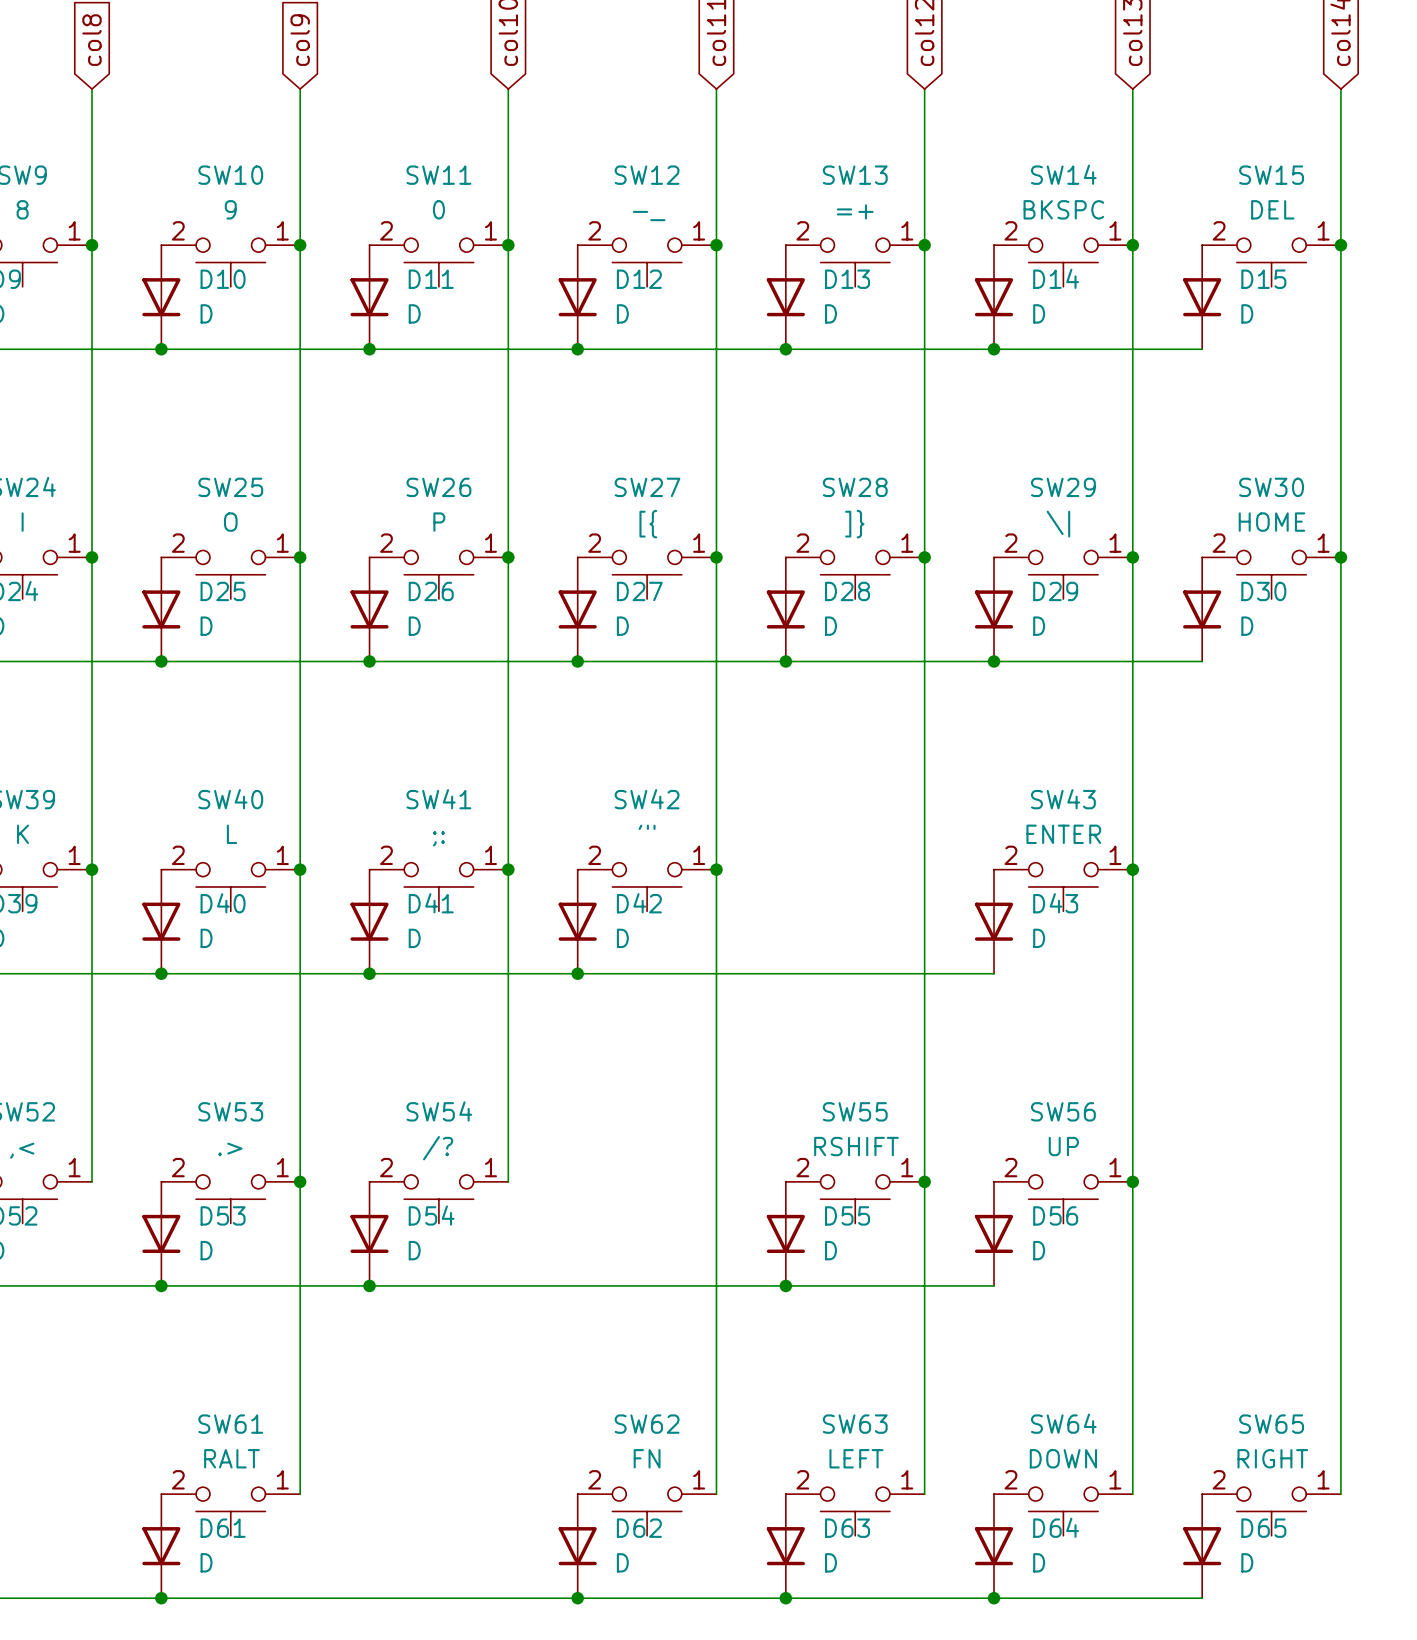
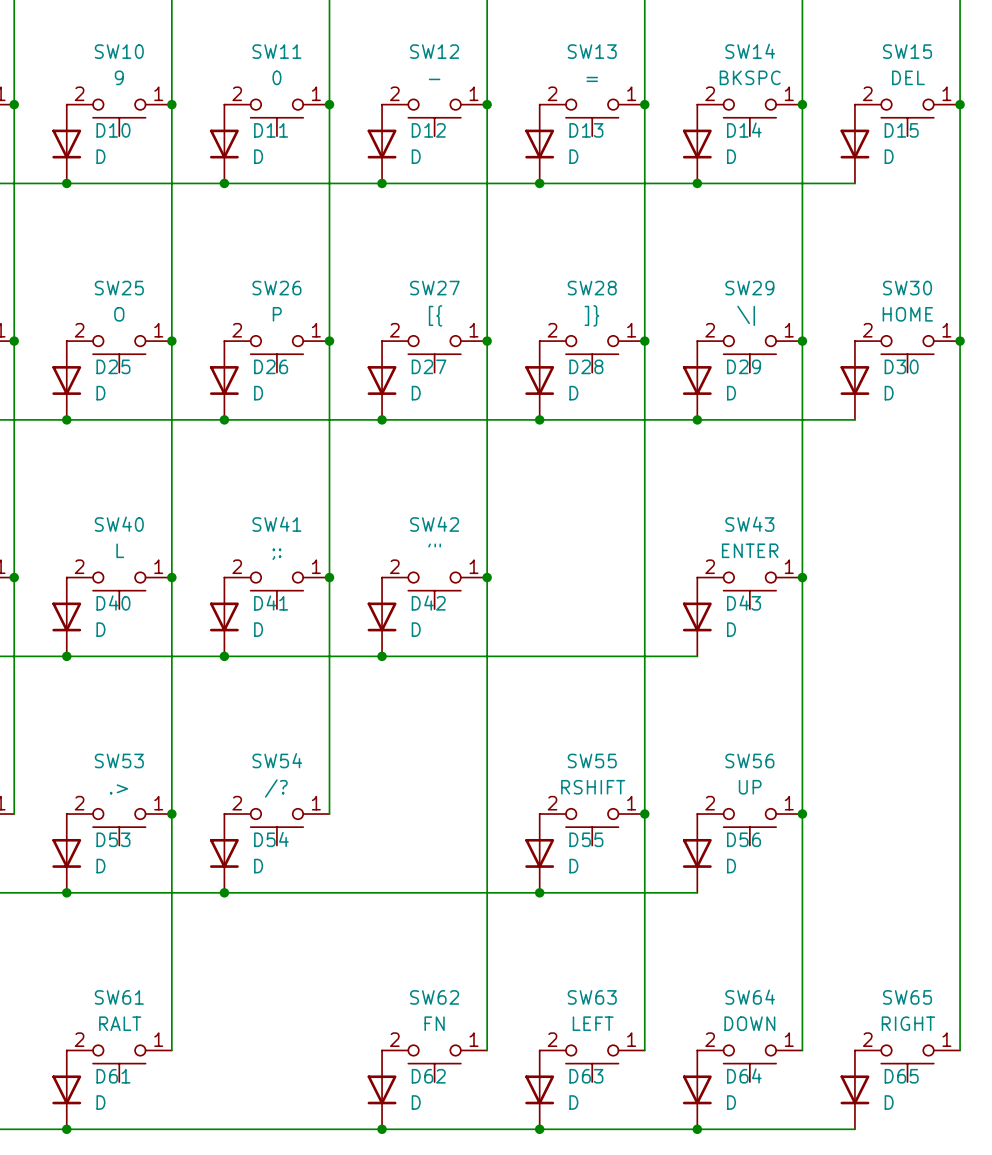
SW13 value: =+ (855, 211) -> = (592, 79)
SW12 value: -_ (649, 216) -> - (434, 79)

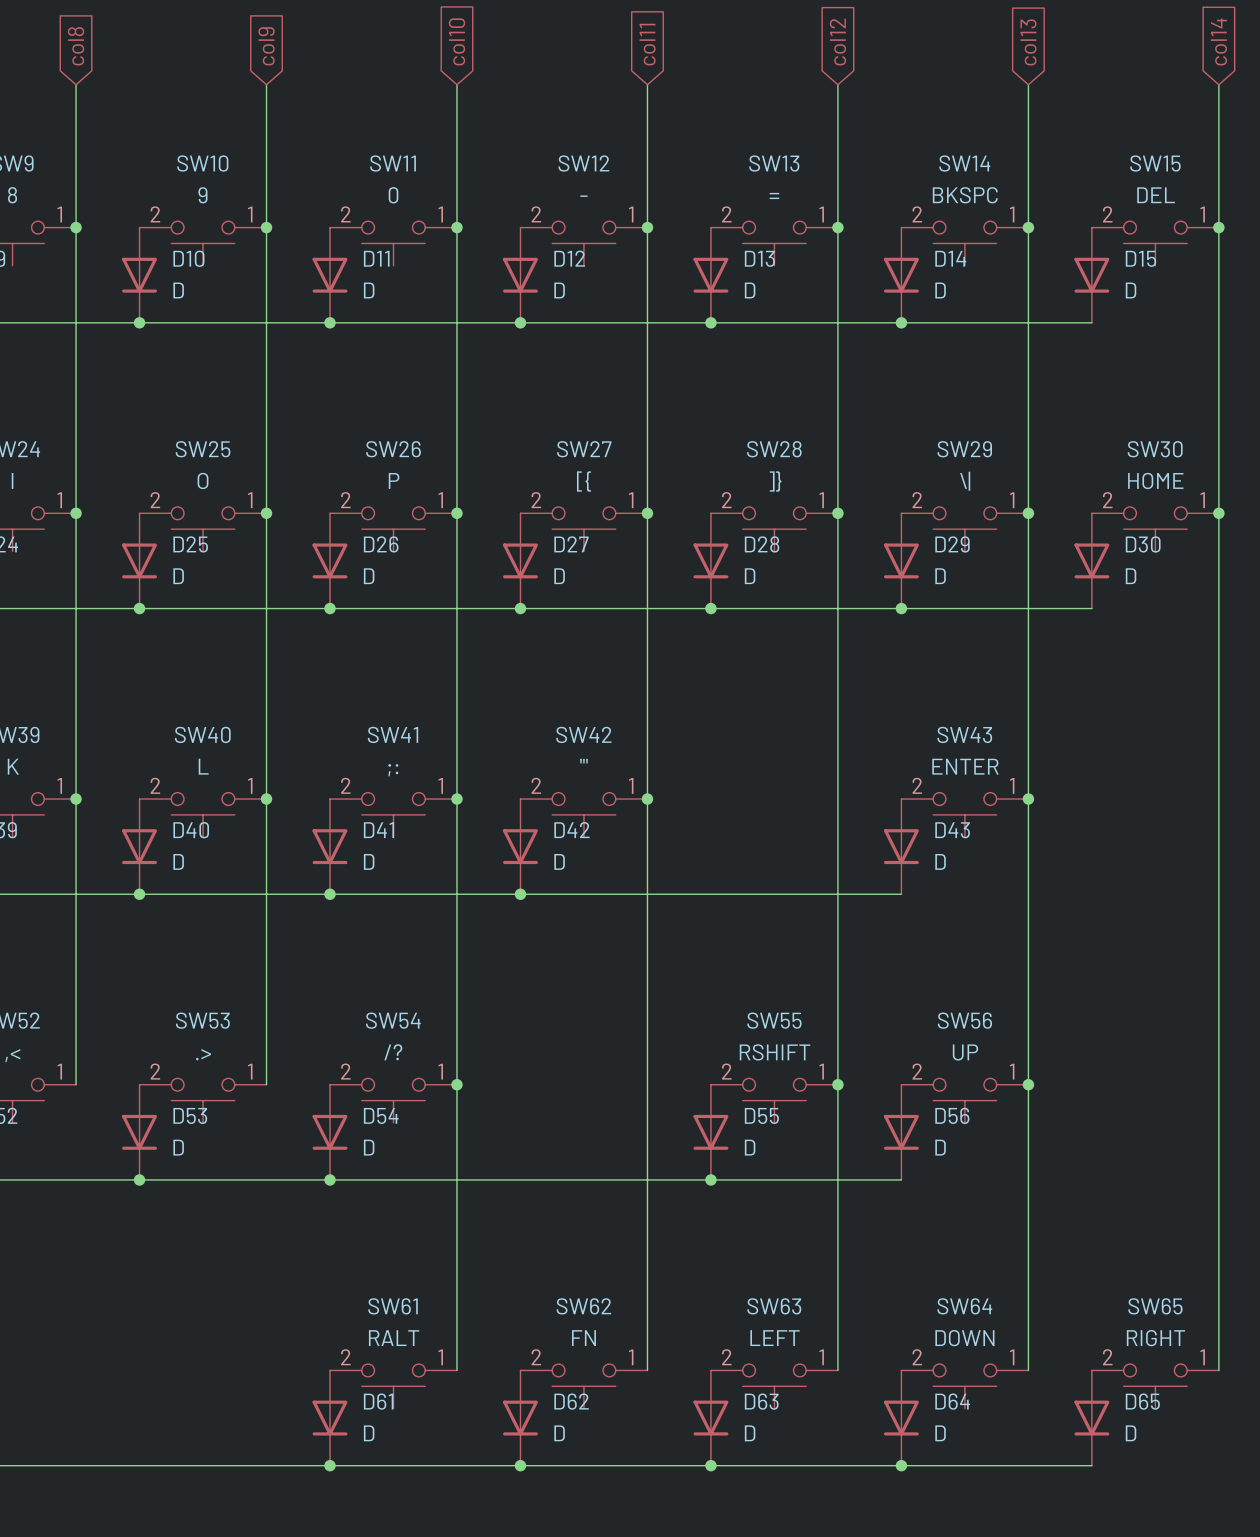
wire: (171, 814) (171, 1050) -> (456, 1084) (456, 1370)
junction: (171, 814) -> none
junction: none -> (456, 1084)
SW61 position: (119, 1063) -> (393, 1386)
D61 position: (66, 1089) -> (330, 1418)
junction: (66, 1129) -> none
junction: none -> (330, 1465)

